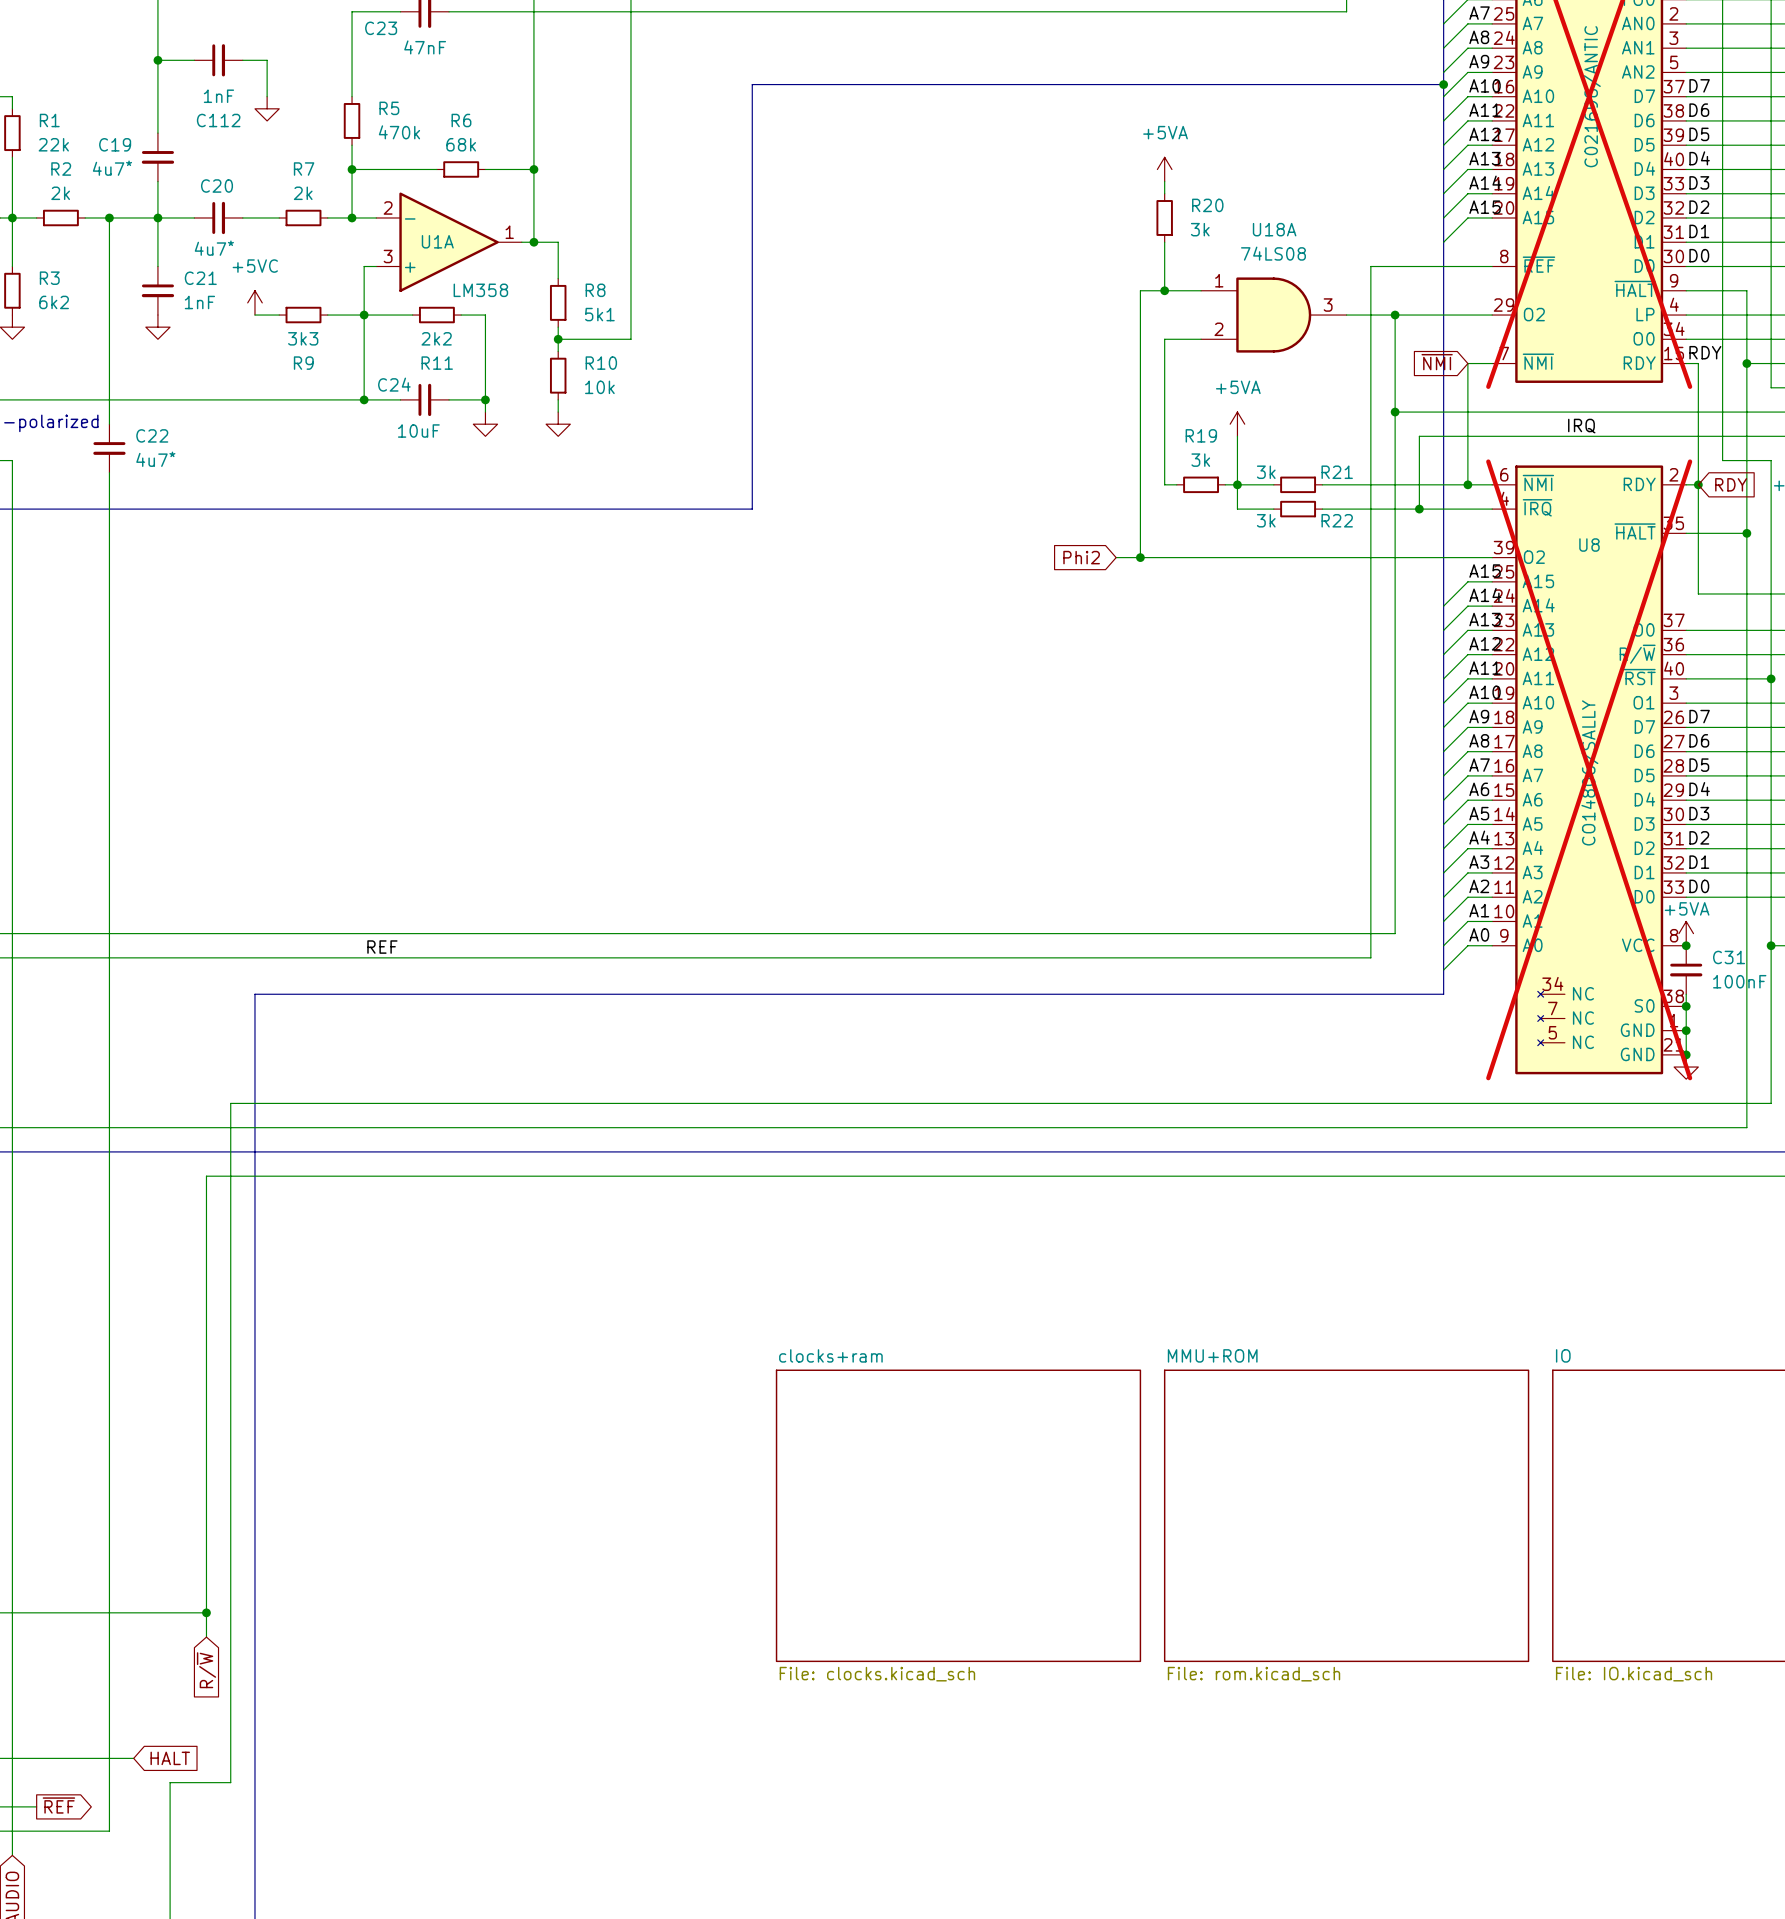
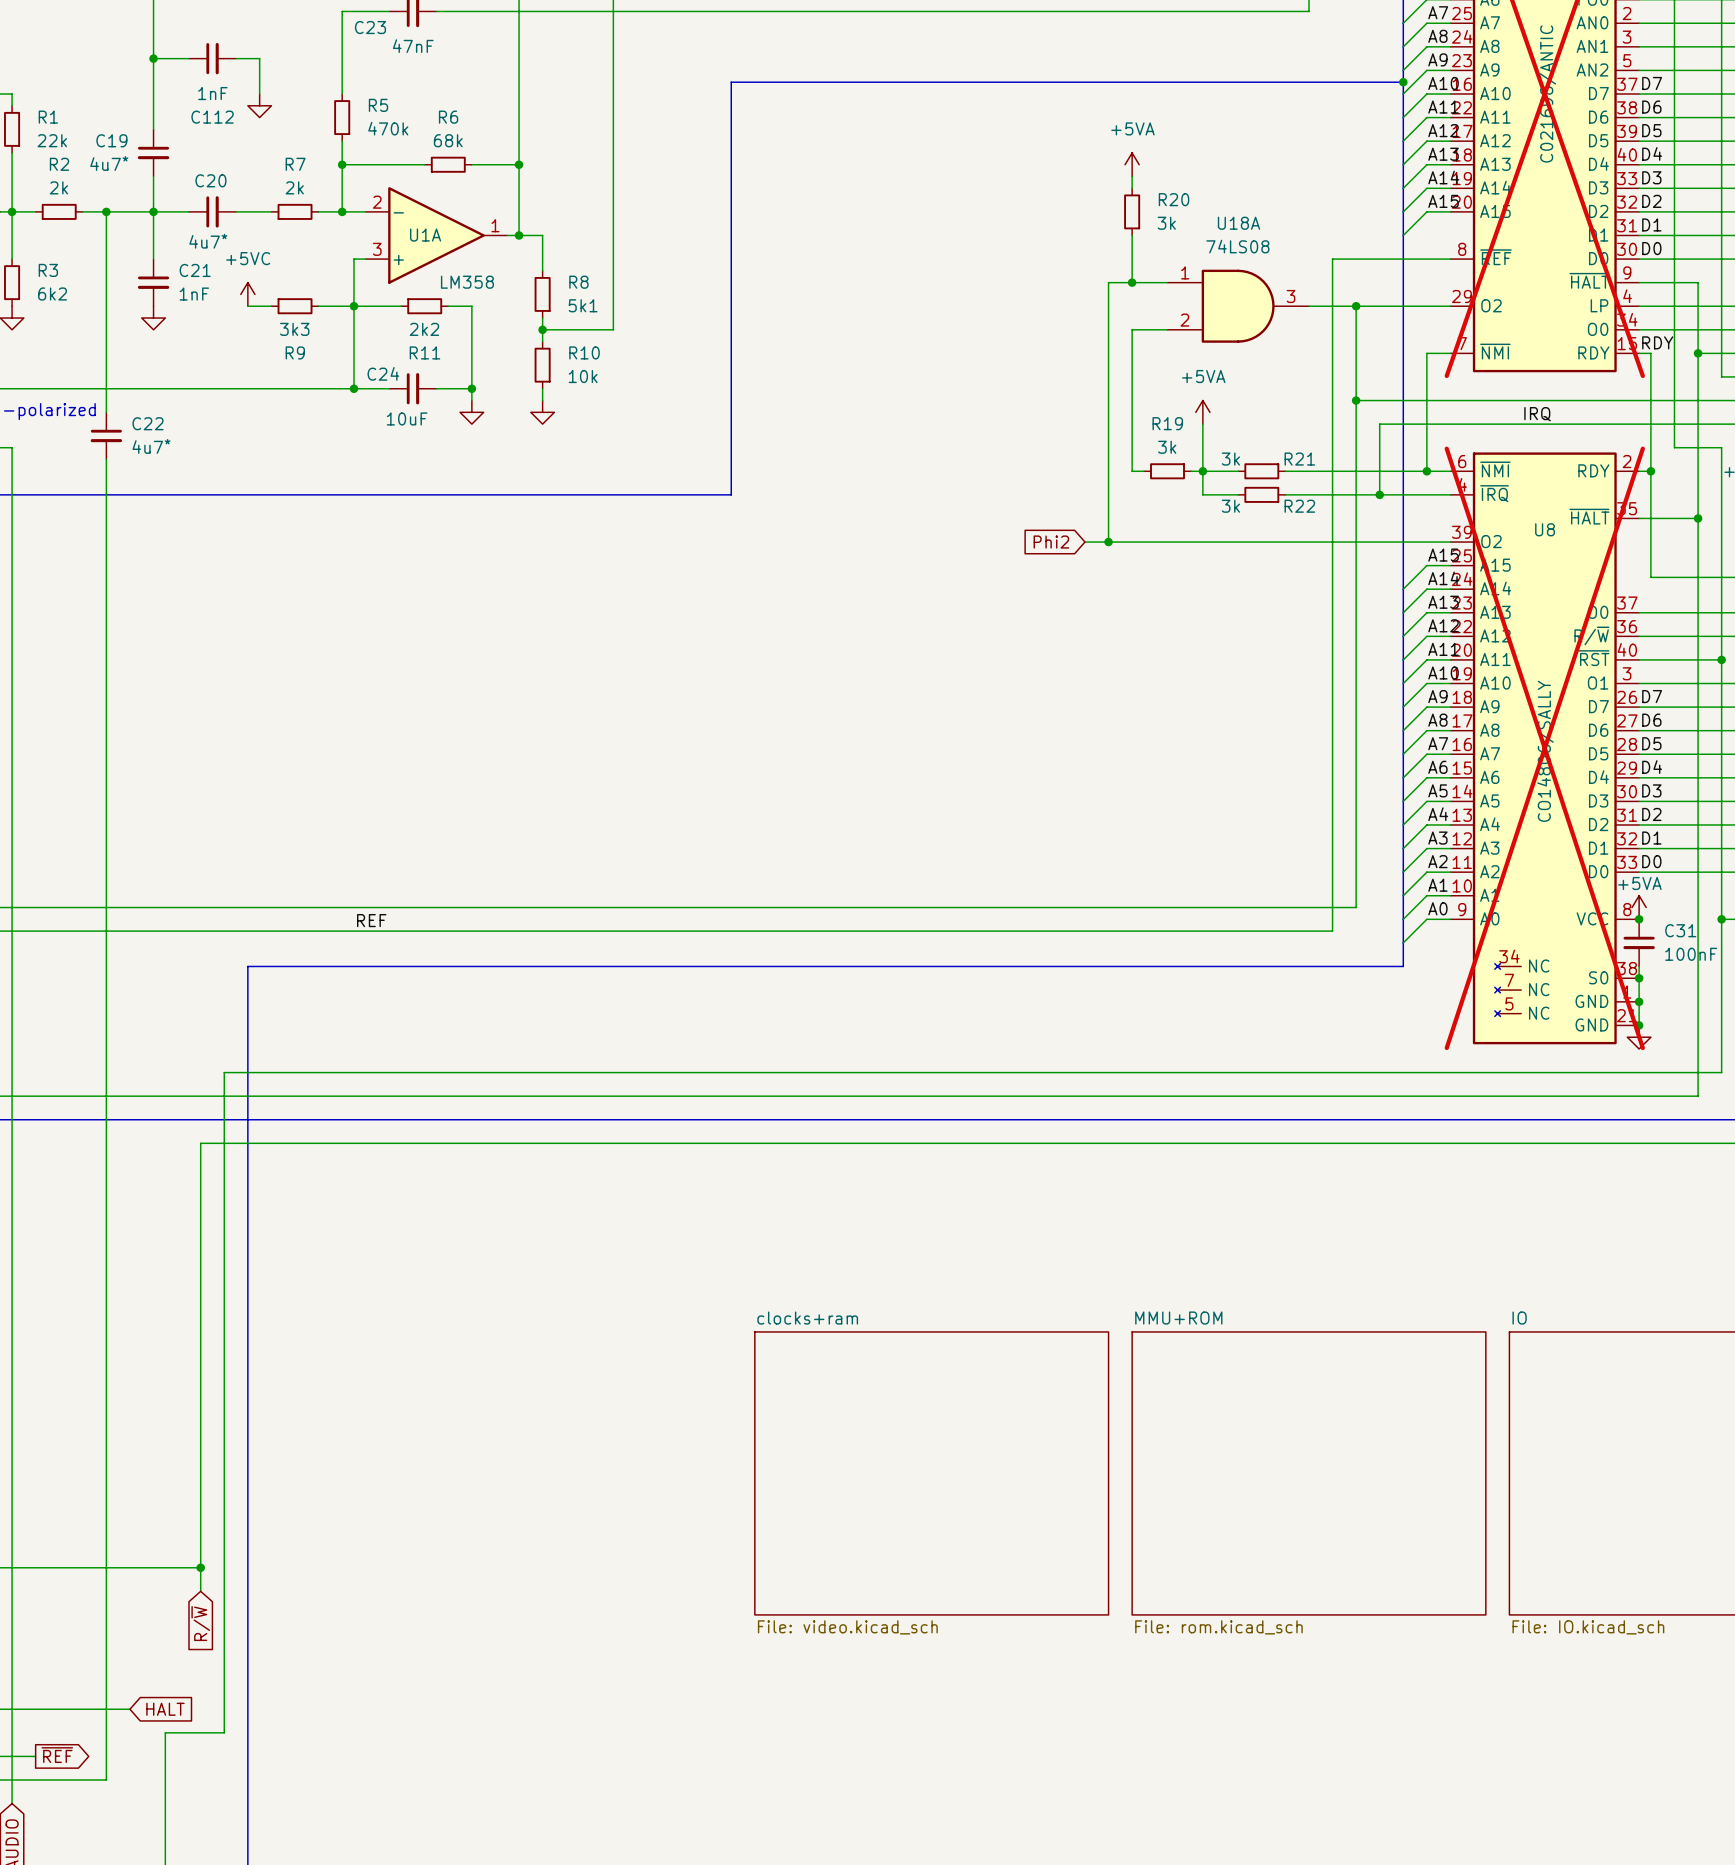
global label: ~{NMI} (1437, 362) -> none
global label: RDY (1731, 484) -> none
sheet clocks+ram value: File: clocks.kicad_sch (877, 1674) -> File: video.kicad_sch (847, 1627)

